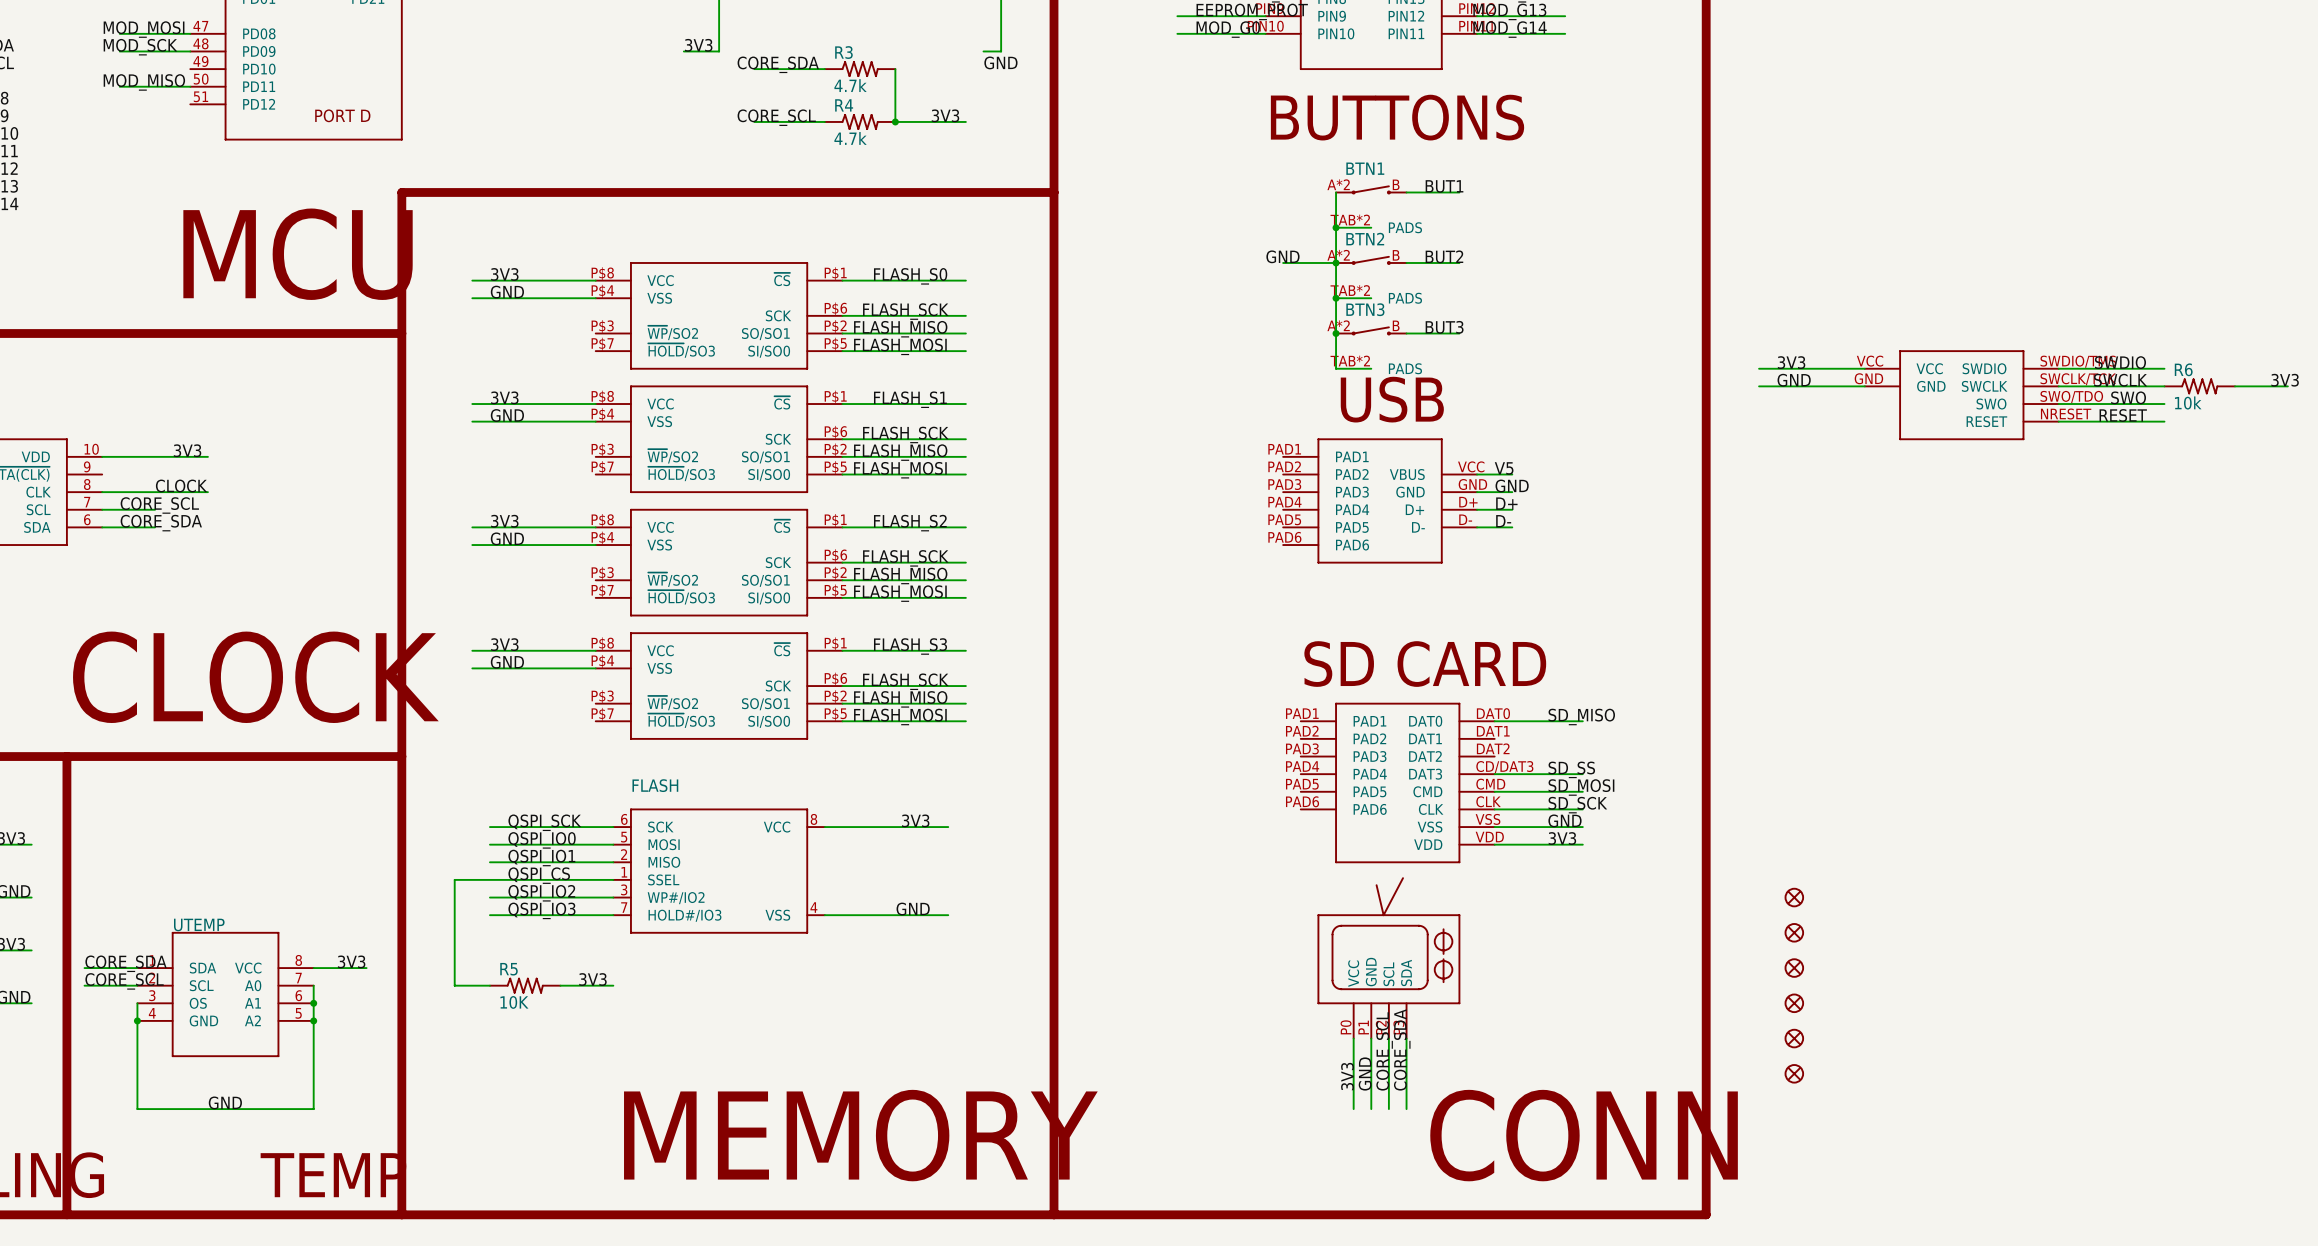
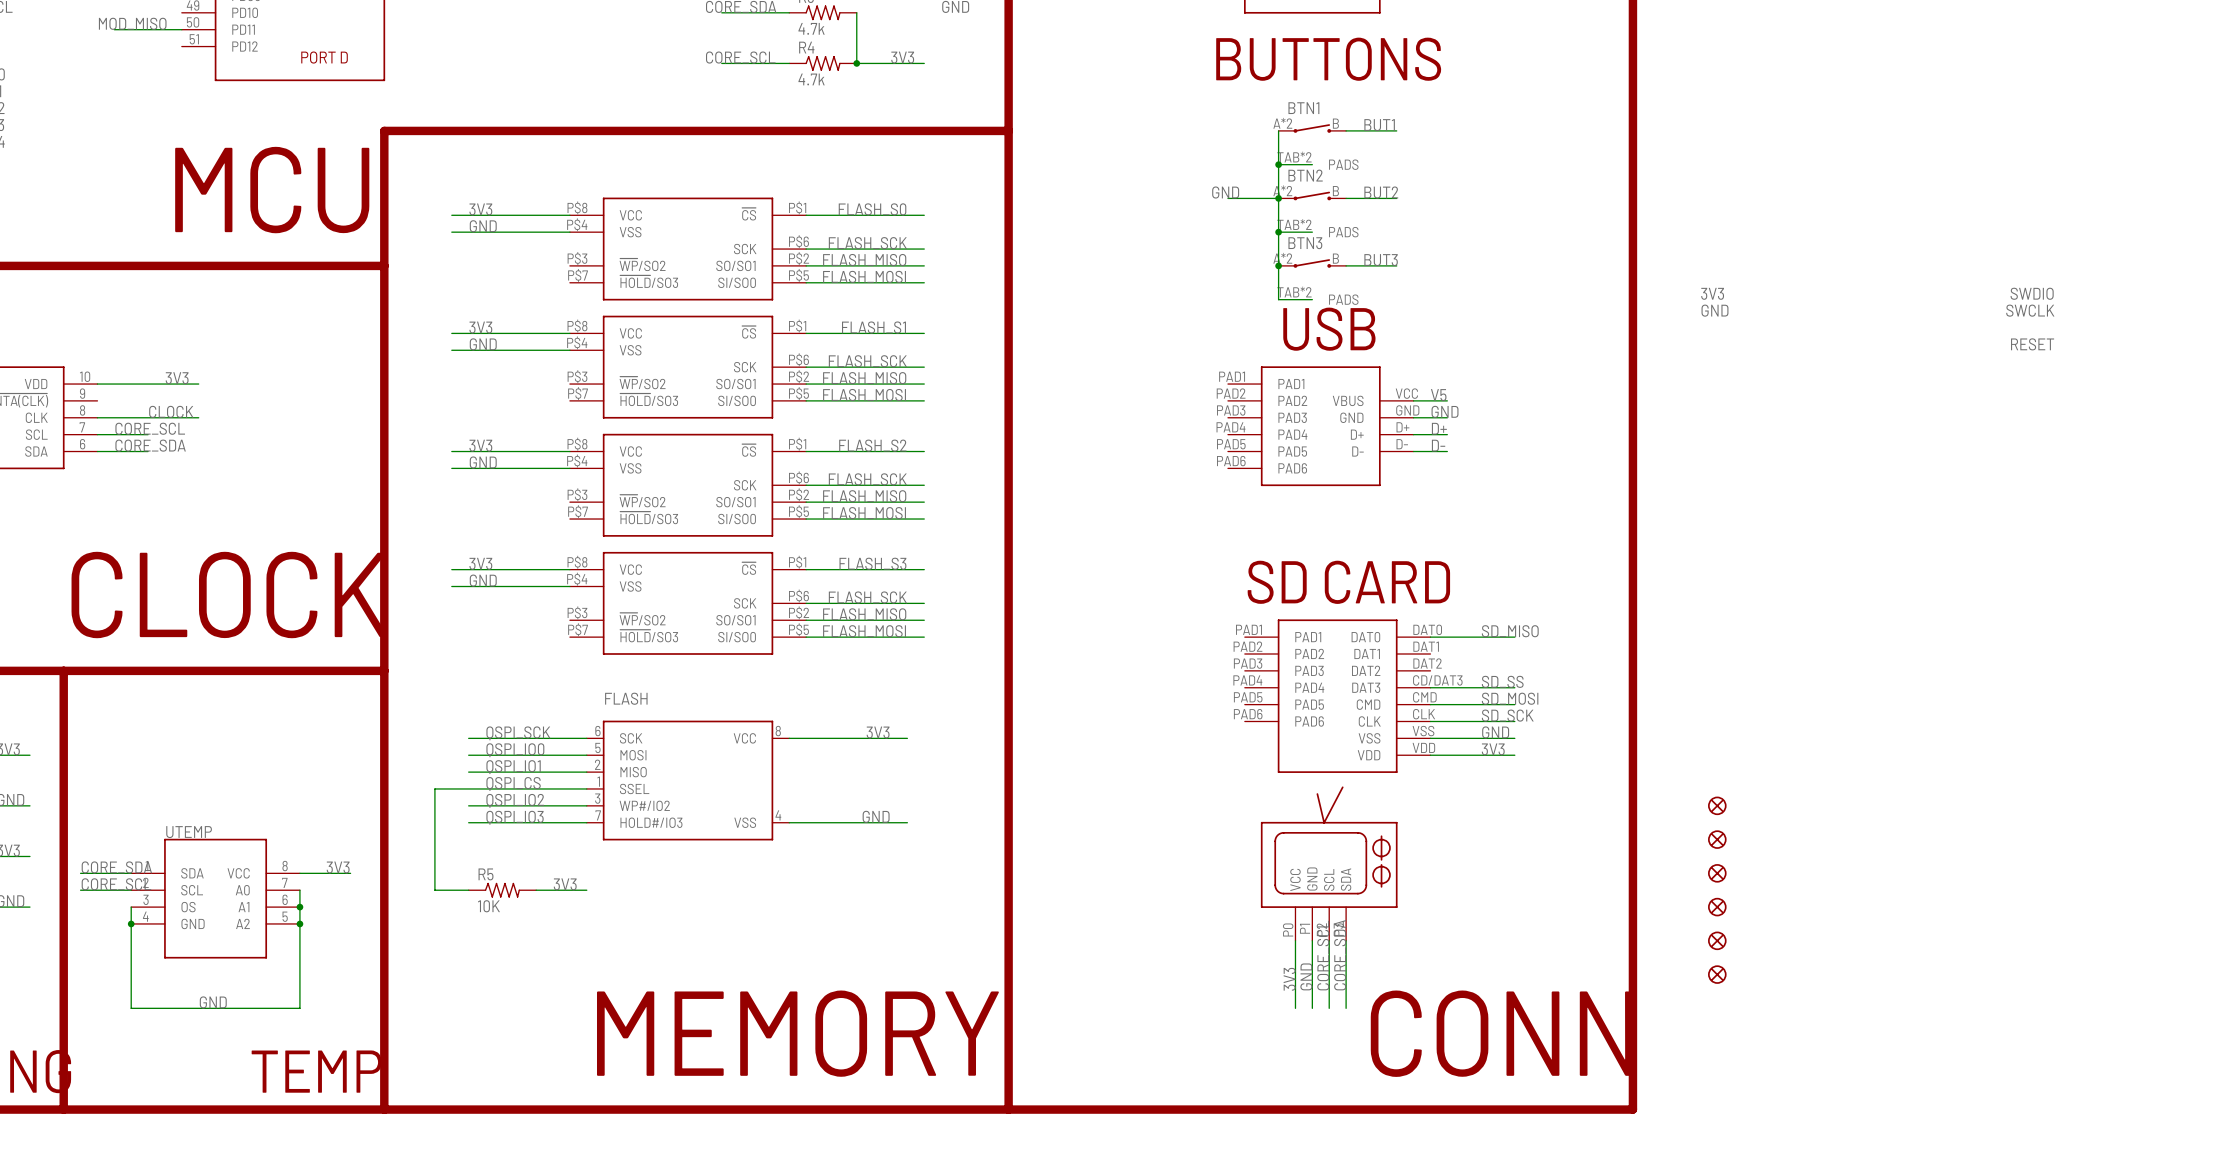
wire: (1759, 368) (1864, 368) -> none
wire: (2058, 368) (2164, 368) -> none
label: 3V3 (2285, 380) -> none
wire: (1759, 386) (1864, 386) -> none
wire: (2058, 386) (2164, 386) -> none
R6: 10k (2199, 386) -> none
wire: (2234, 386) (2287, 386) -> none
part: (1961, 395) -> none
label: SWO (2128, 397) -> none
wire: (2058, 404) (2164, 404) -> none
wire: (2058, 421) (2164, 421) -> none

